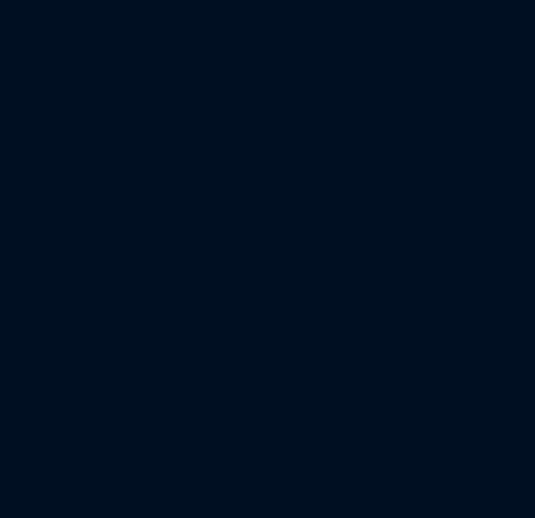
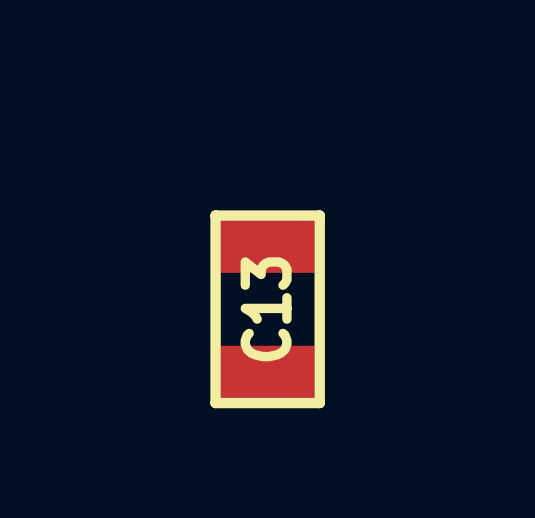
C13: none -> (267, 309)

